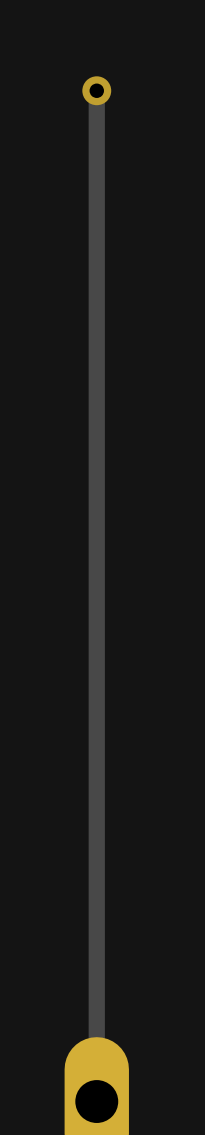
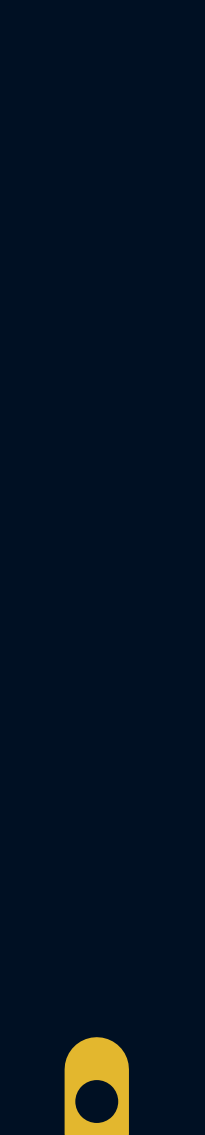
track: (96, 90) (96, 1101) -> none
via: (96, 90) -> none

